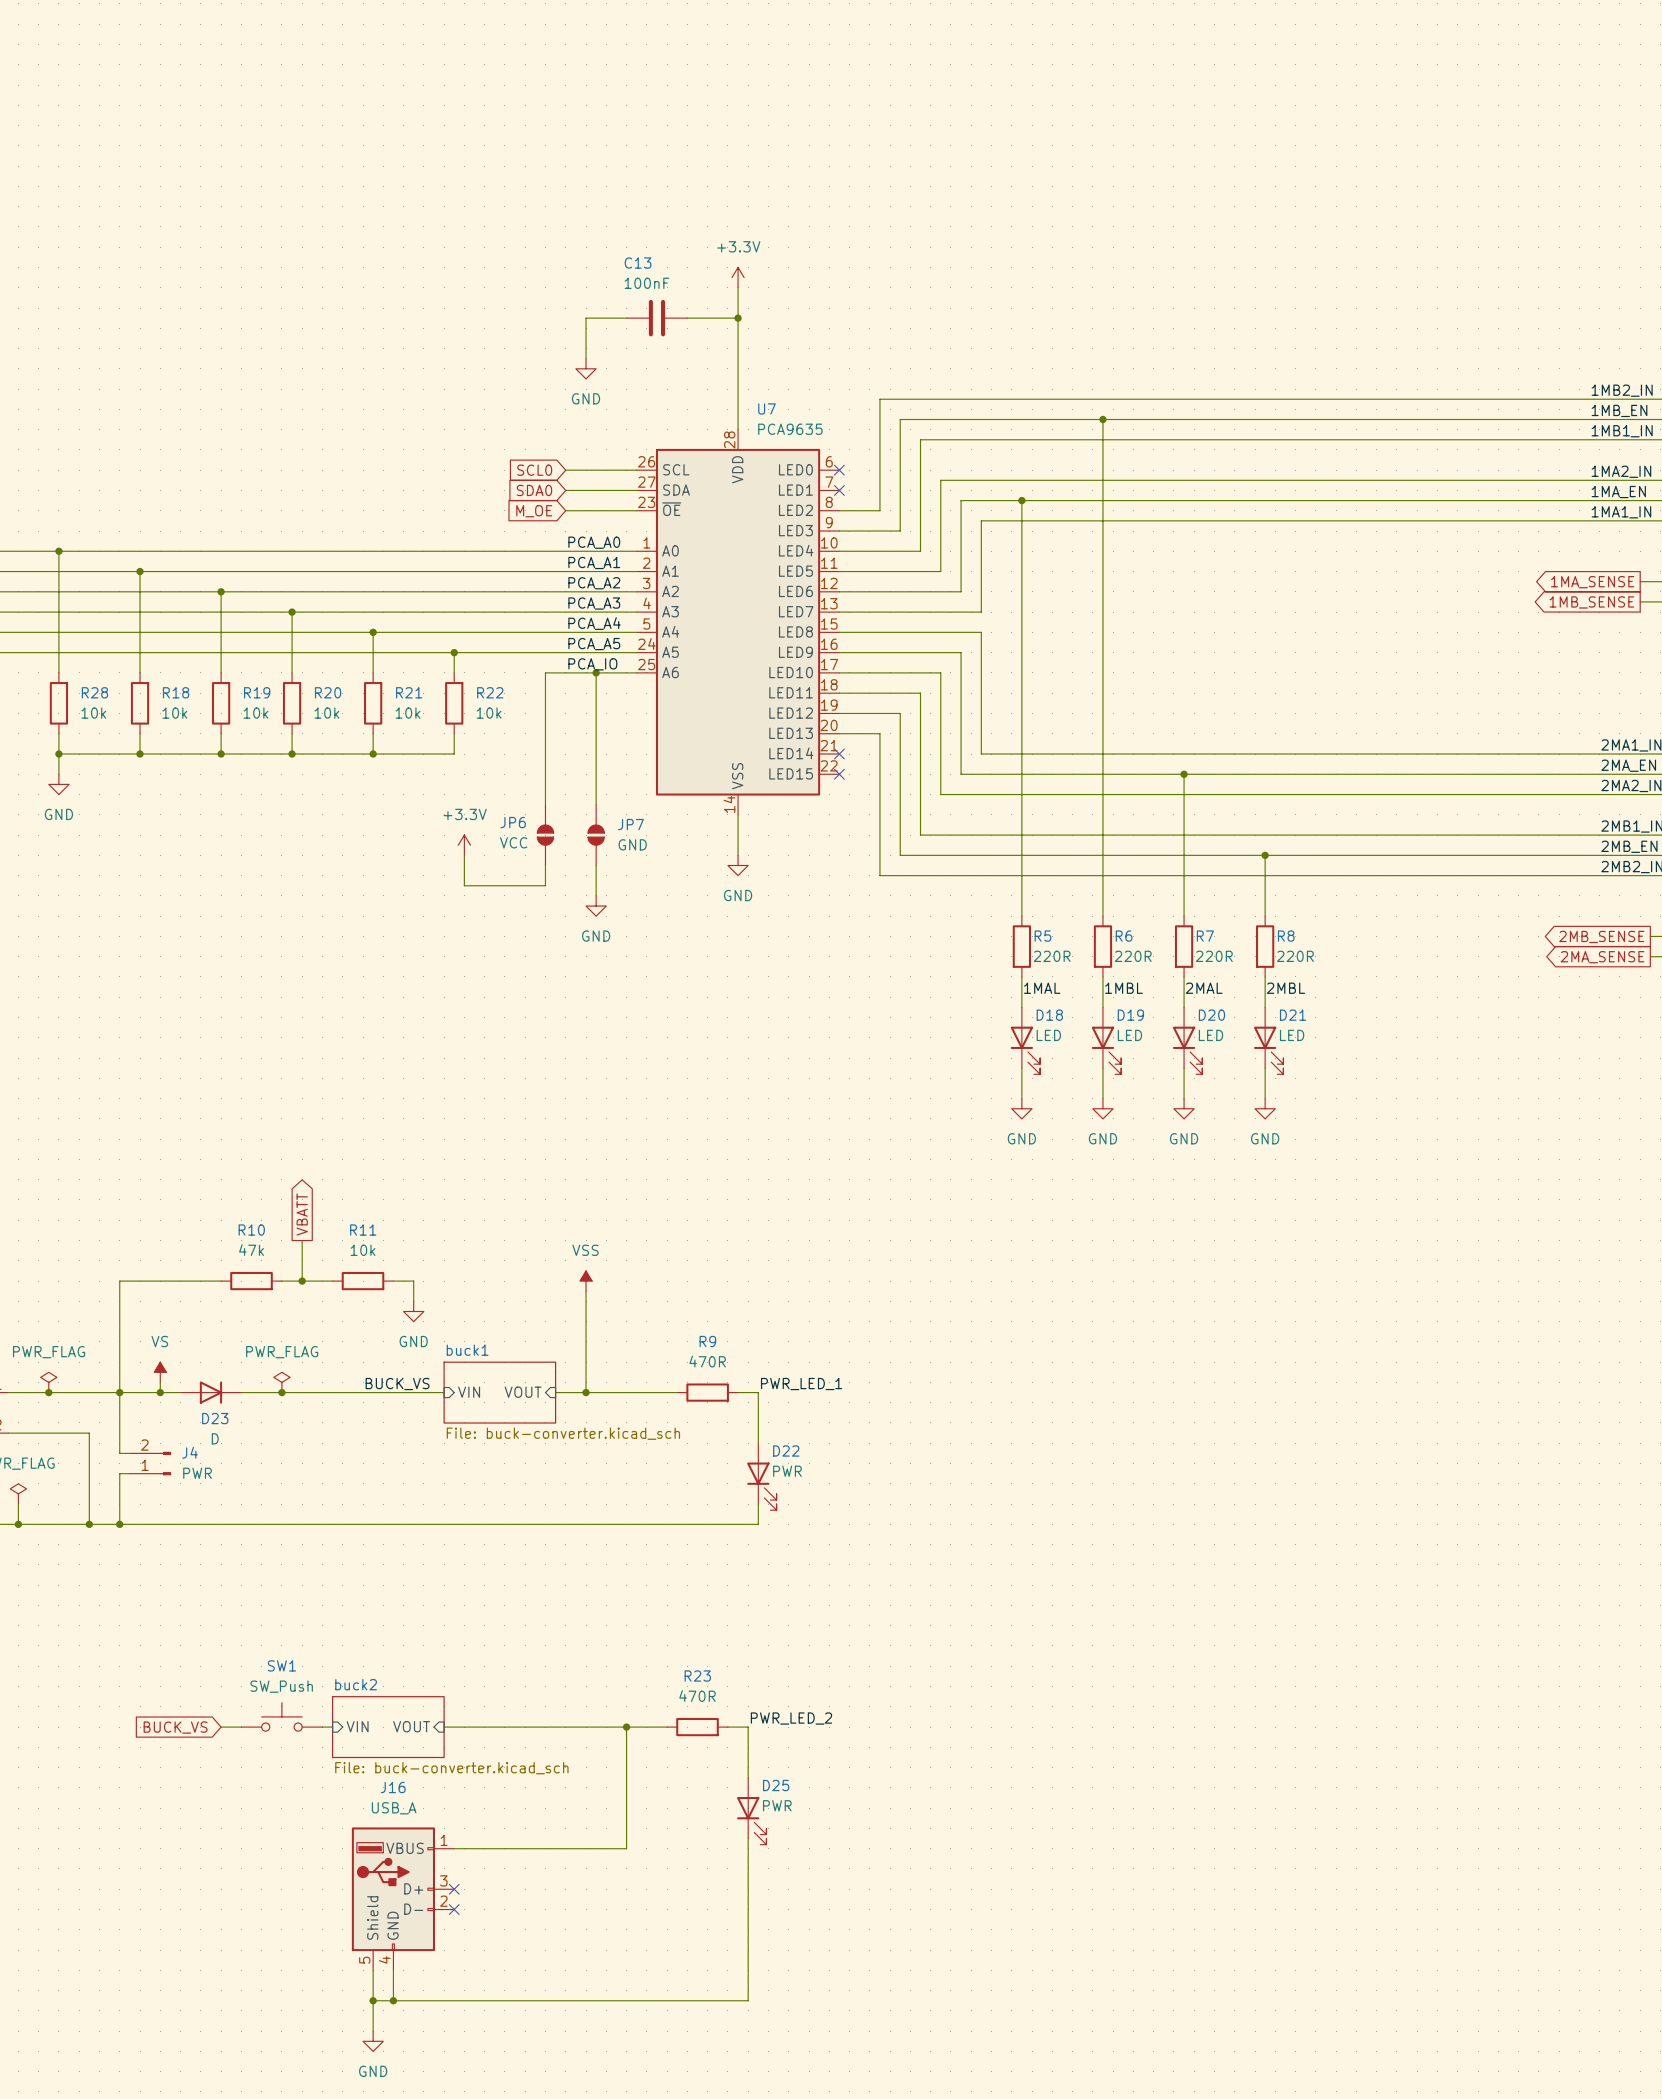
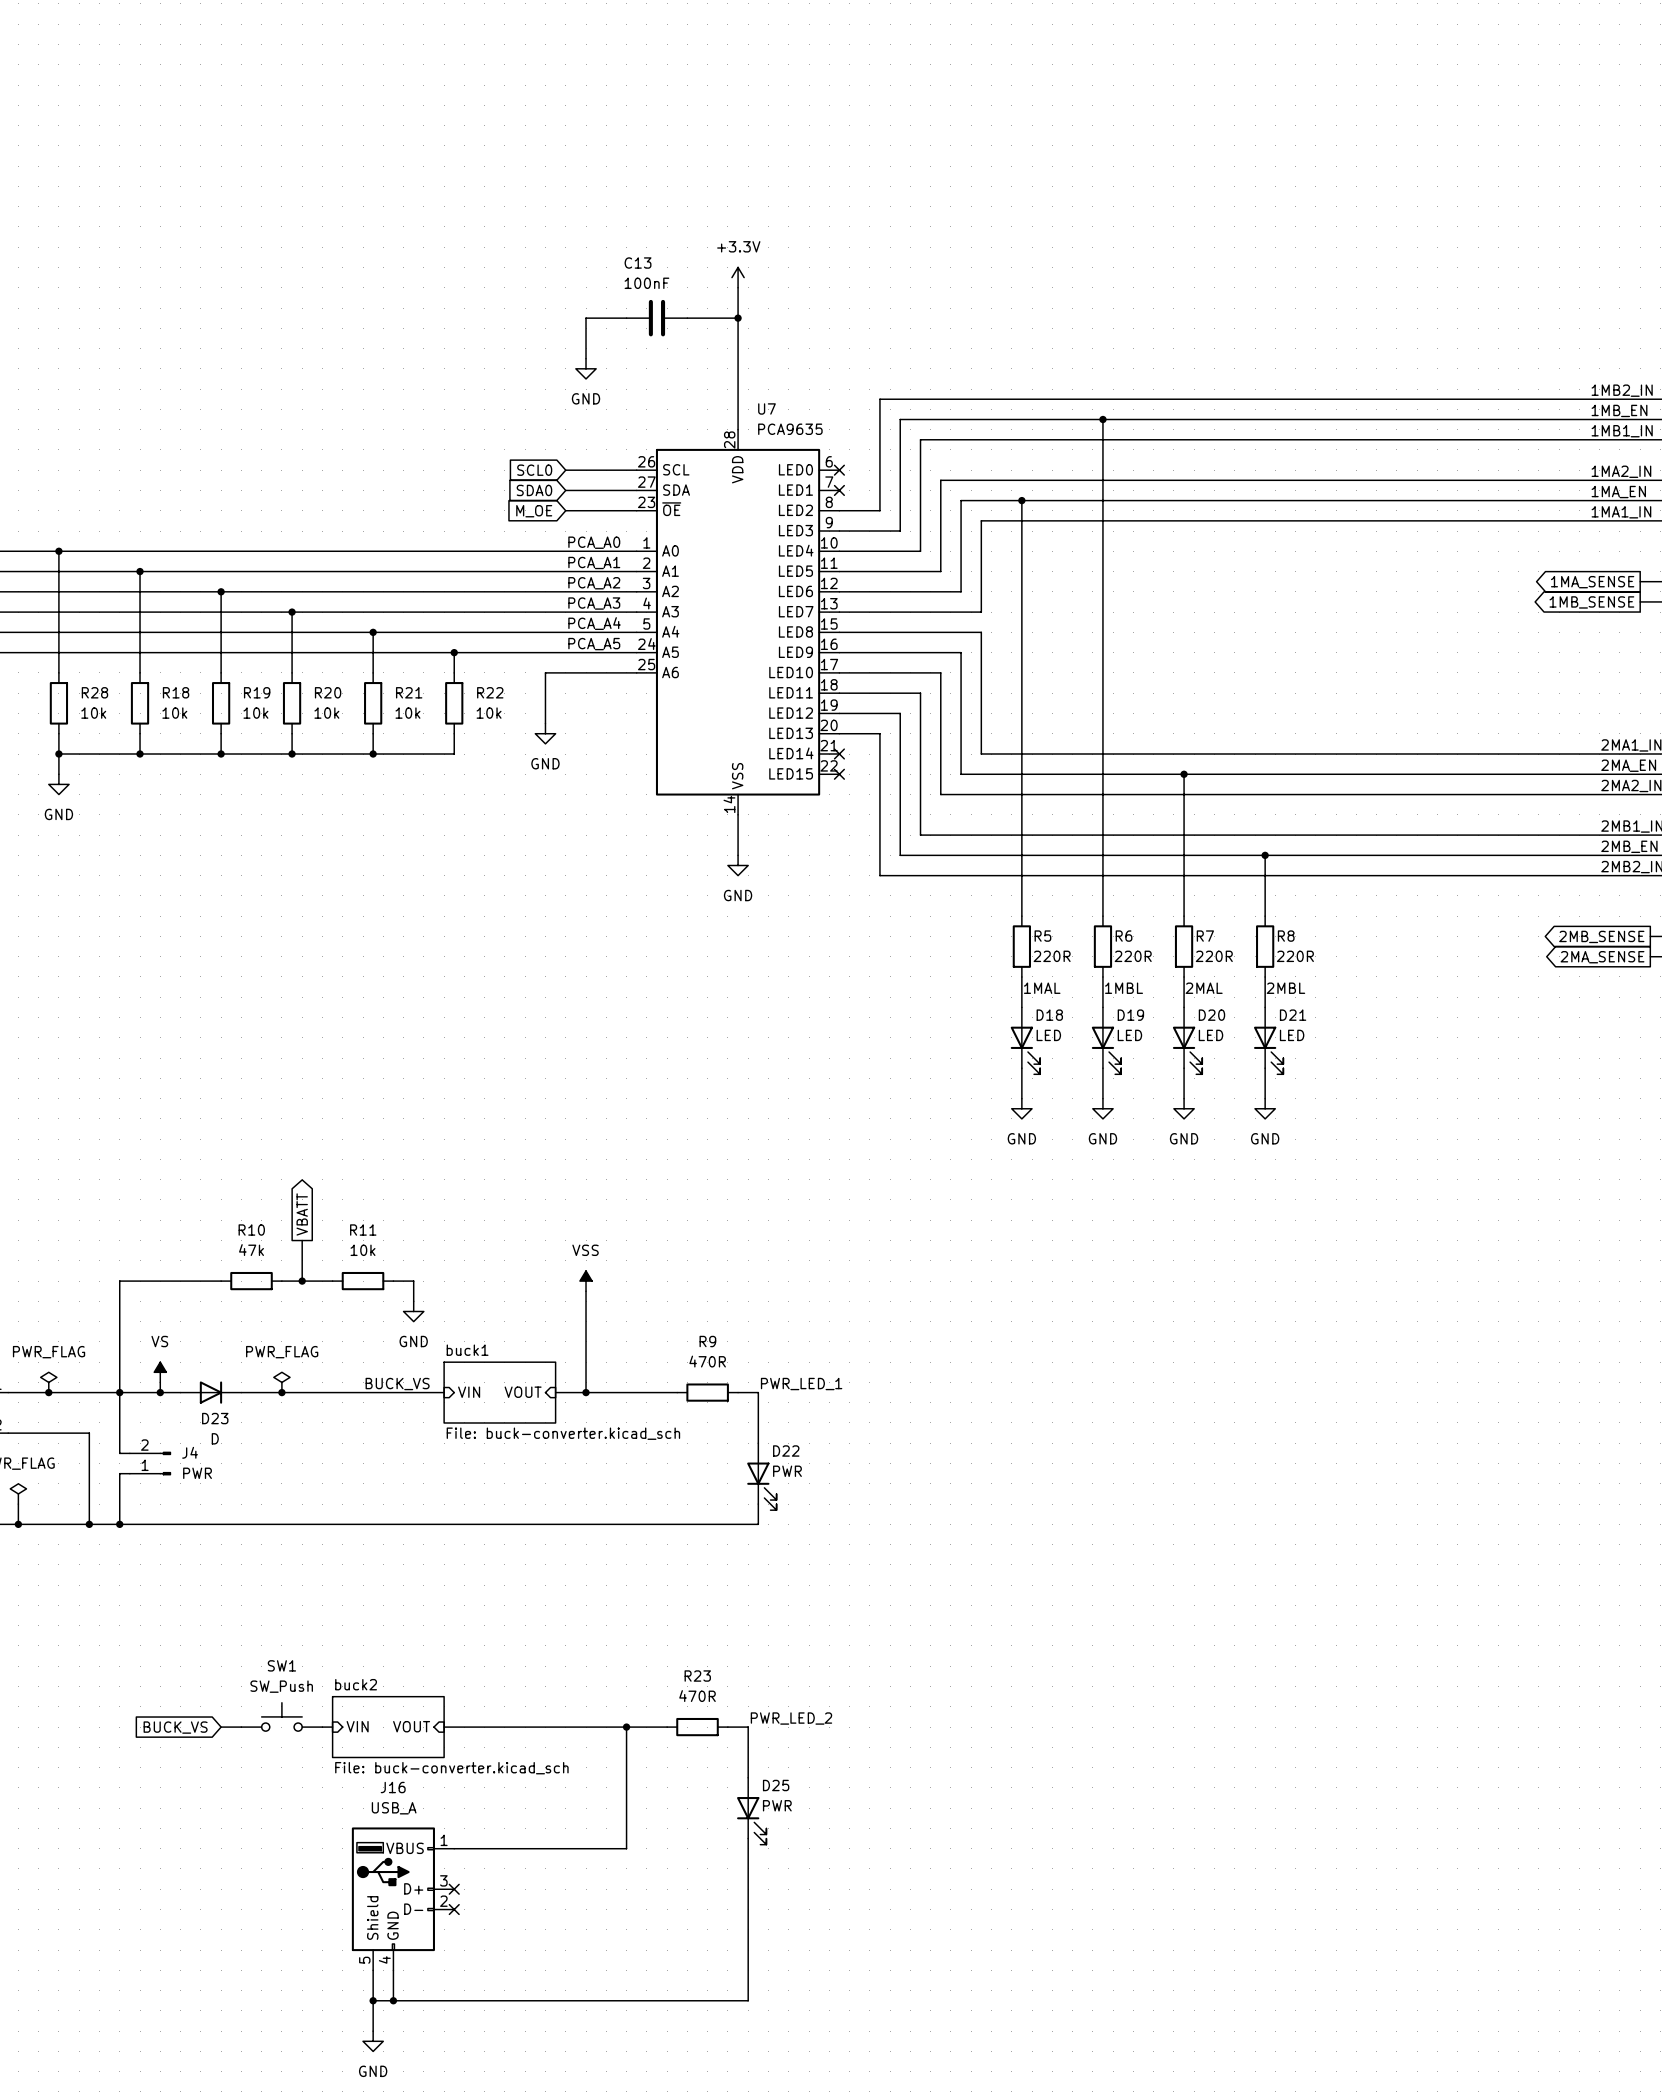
label: PCA_IO (592, 664) -> none
wire: (596, 672) (596, 804) -> none
junction: (596, 672) -> none
wire: (545, 723) (545, 804) -> none
JP6: VCC (545, 835) -> none
JP7: GND (596, 835) -> none
power symbol: +3.3V (464, 845) -> none
wire: (464, 855) (464, 885) (545, 885) (545, 865) -> none
wire: (596, 865) (596, 895) -> none
power symbol position: GND (596, 906) -> GND (545, 733)

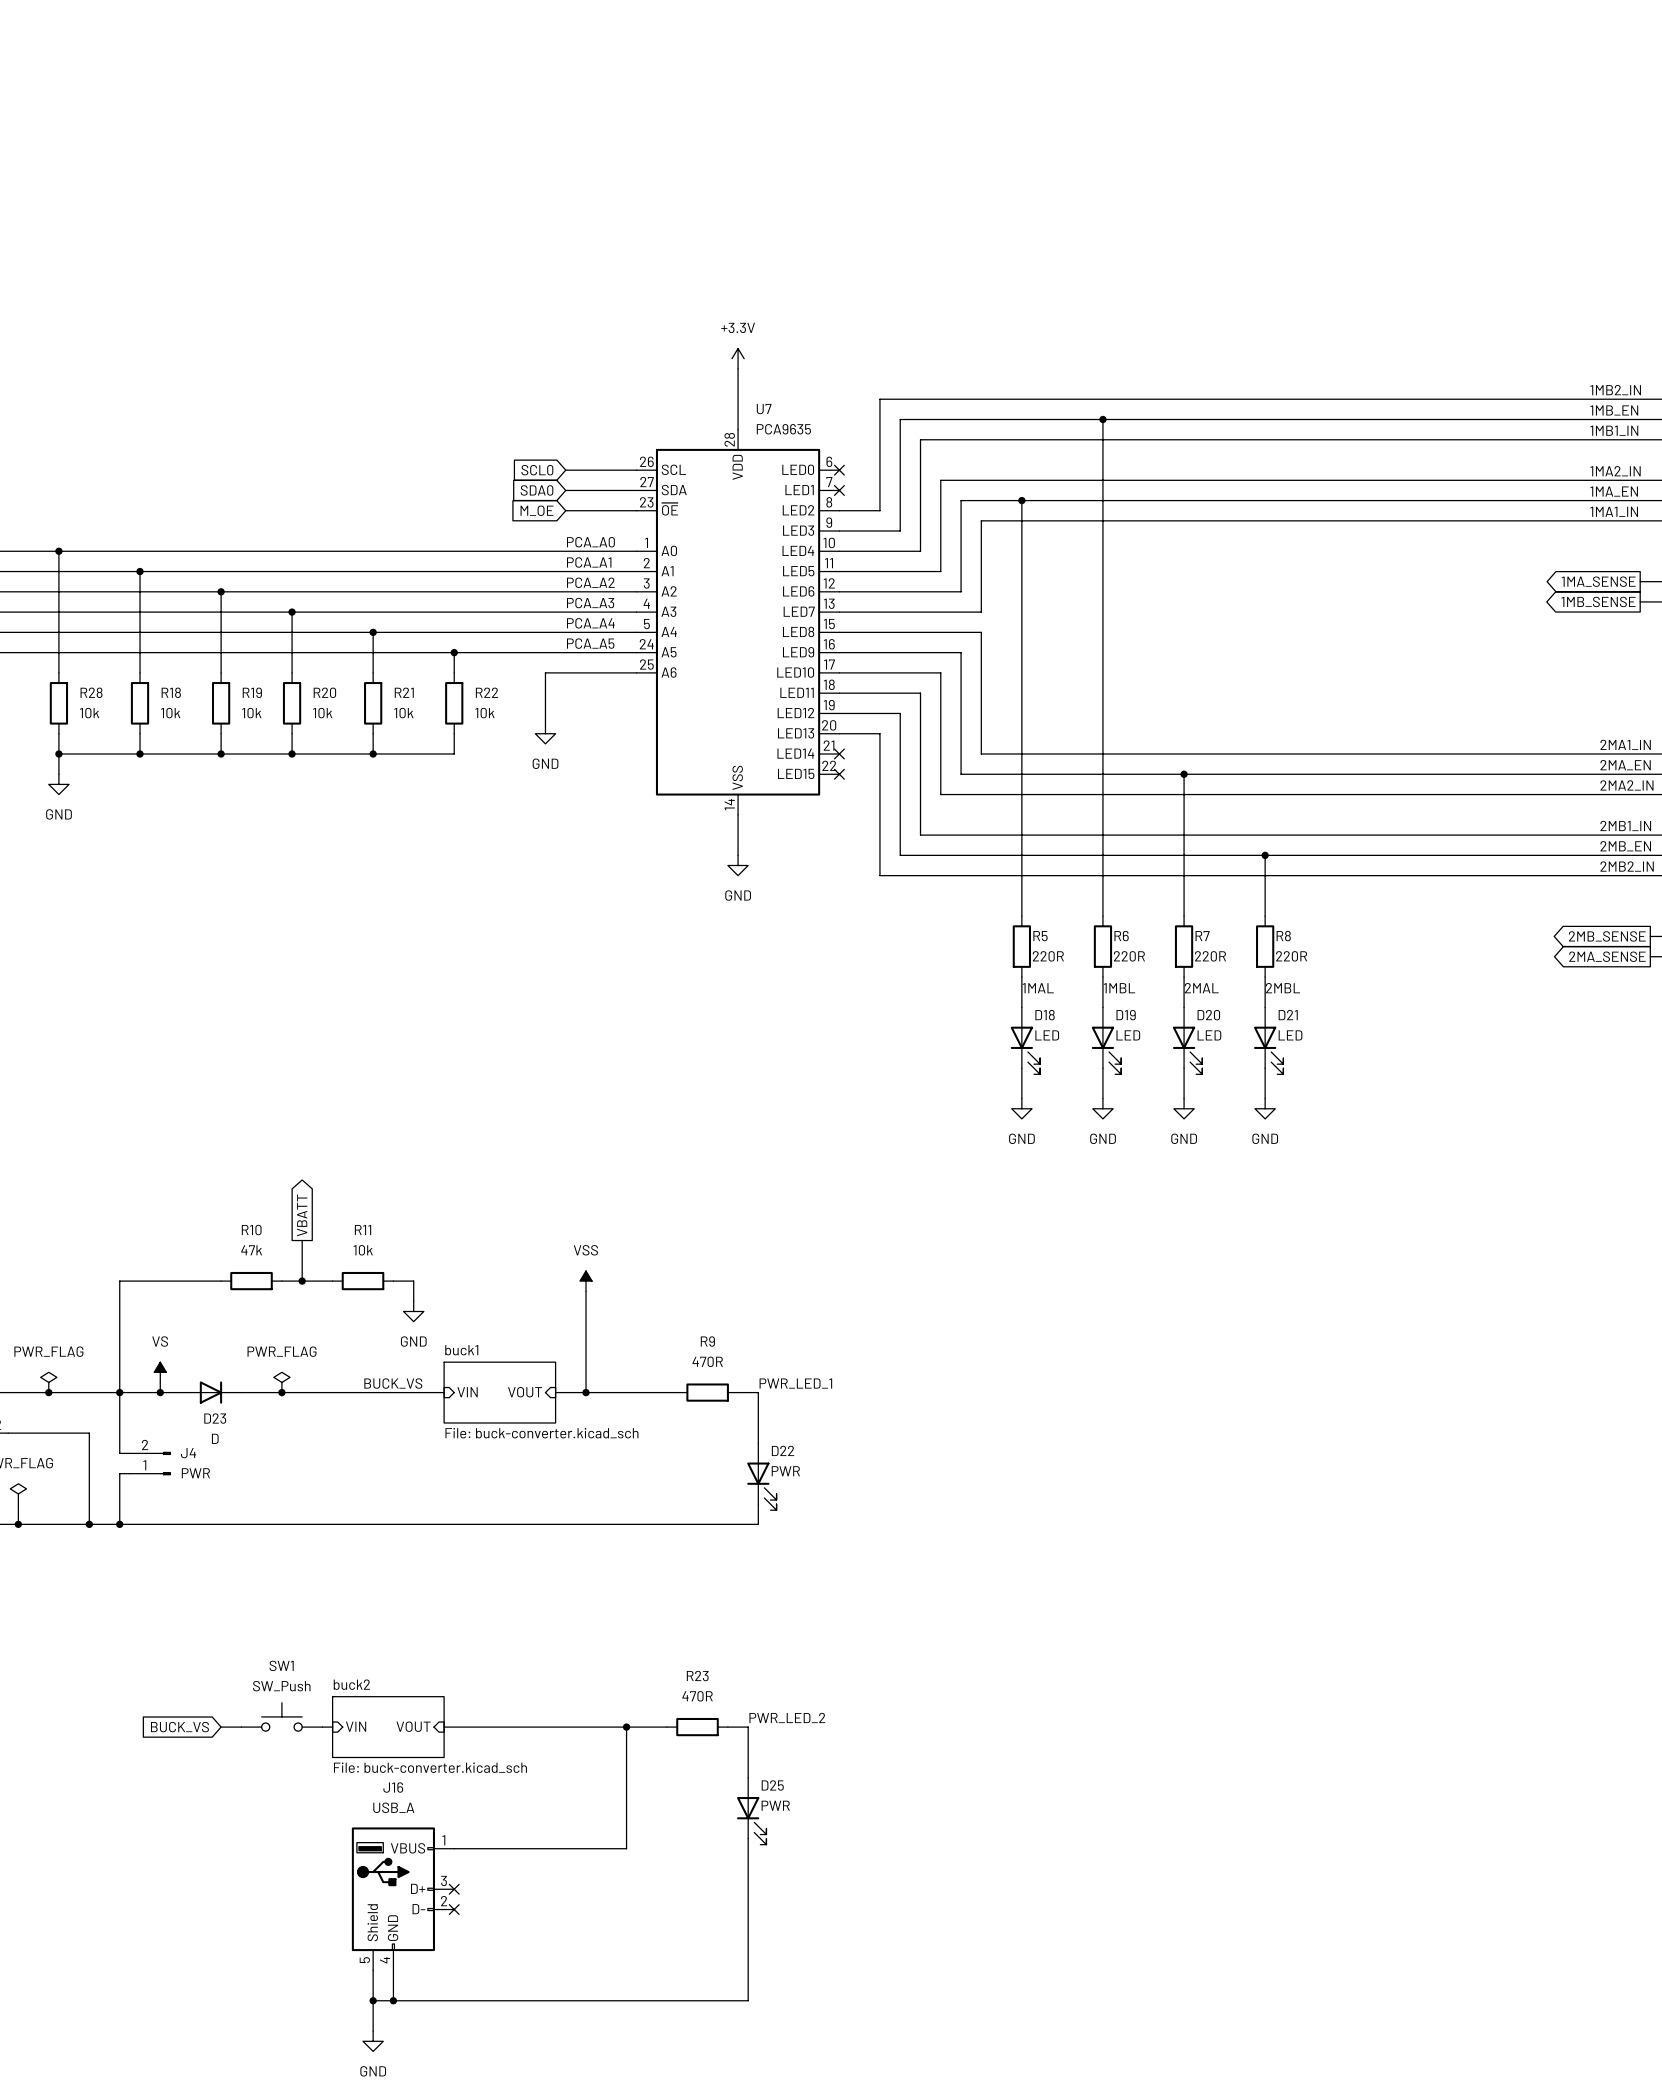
power symbol position: +3.3V (738, 277) -> +3.3V (738, 358)
wire: (738, 287) (738, 368) -> none
wire: (626, 318) (586, 318) (586, 358) -> none
C13: 100nF (656, 318) -> none
wire: (687, 318) (738, 318) -> none
junction: (738, 318) -> none
power symbol: GND (586, 368) -> none

